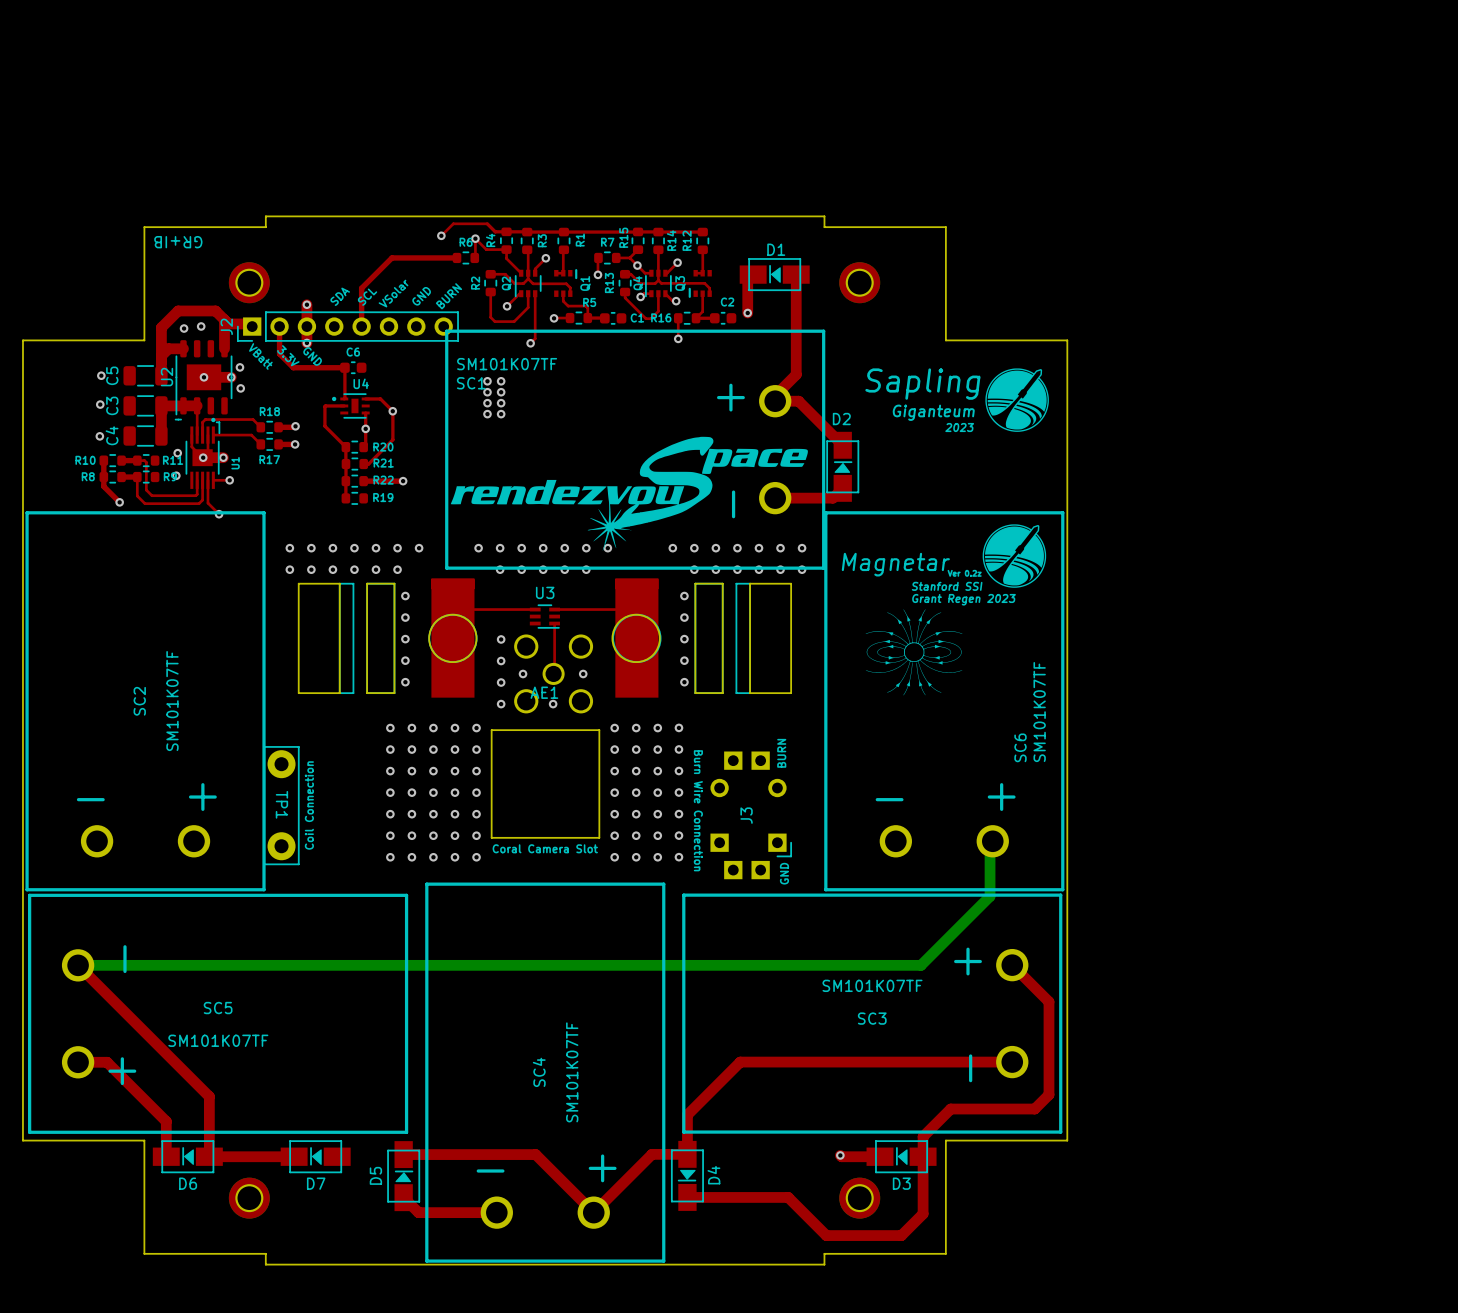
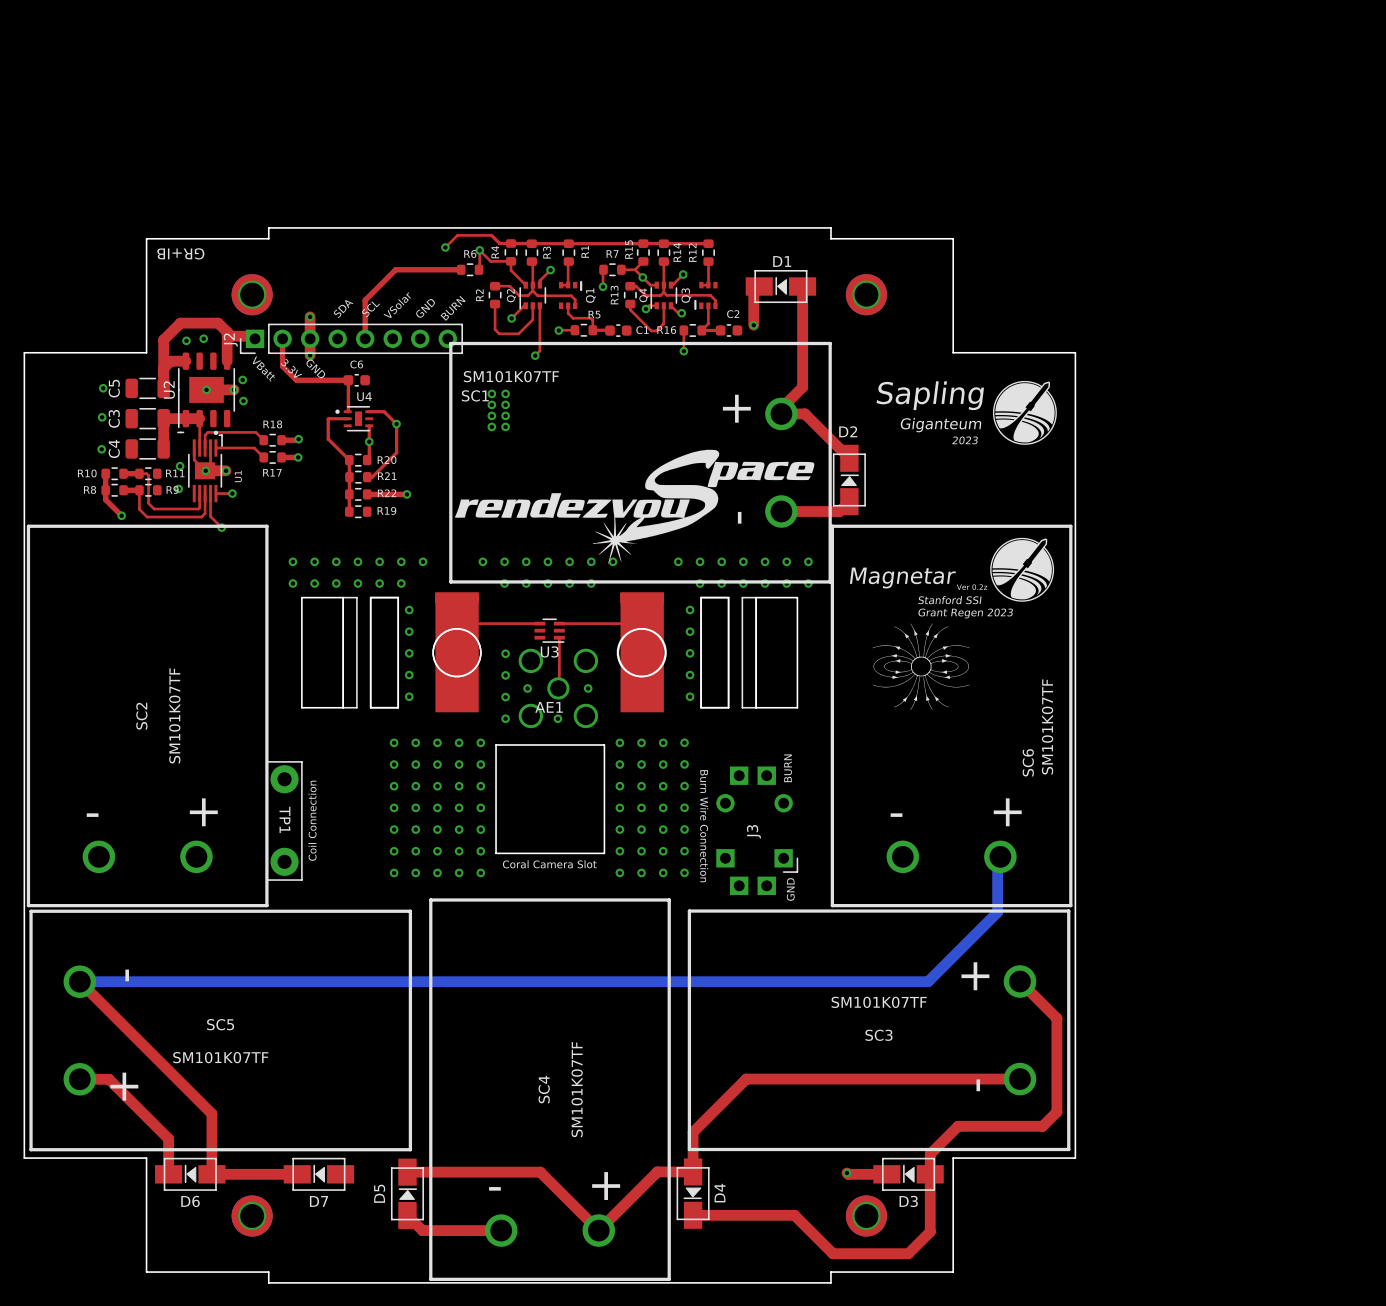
U3 name position: U3 (545, 592) -> U3 (549, 651)

